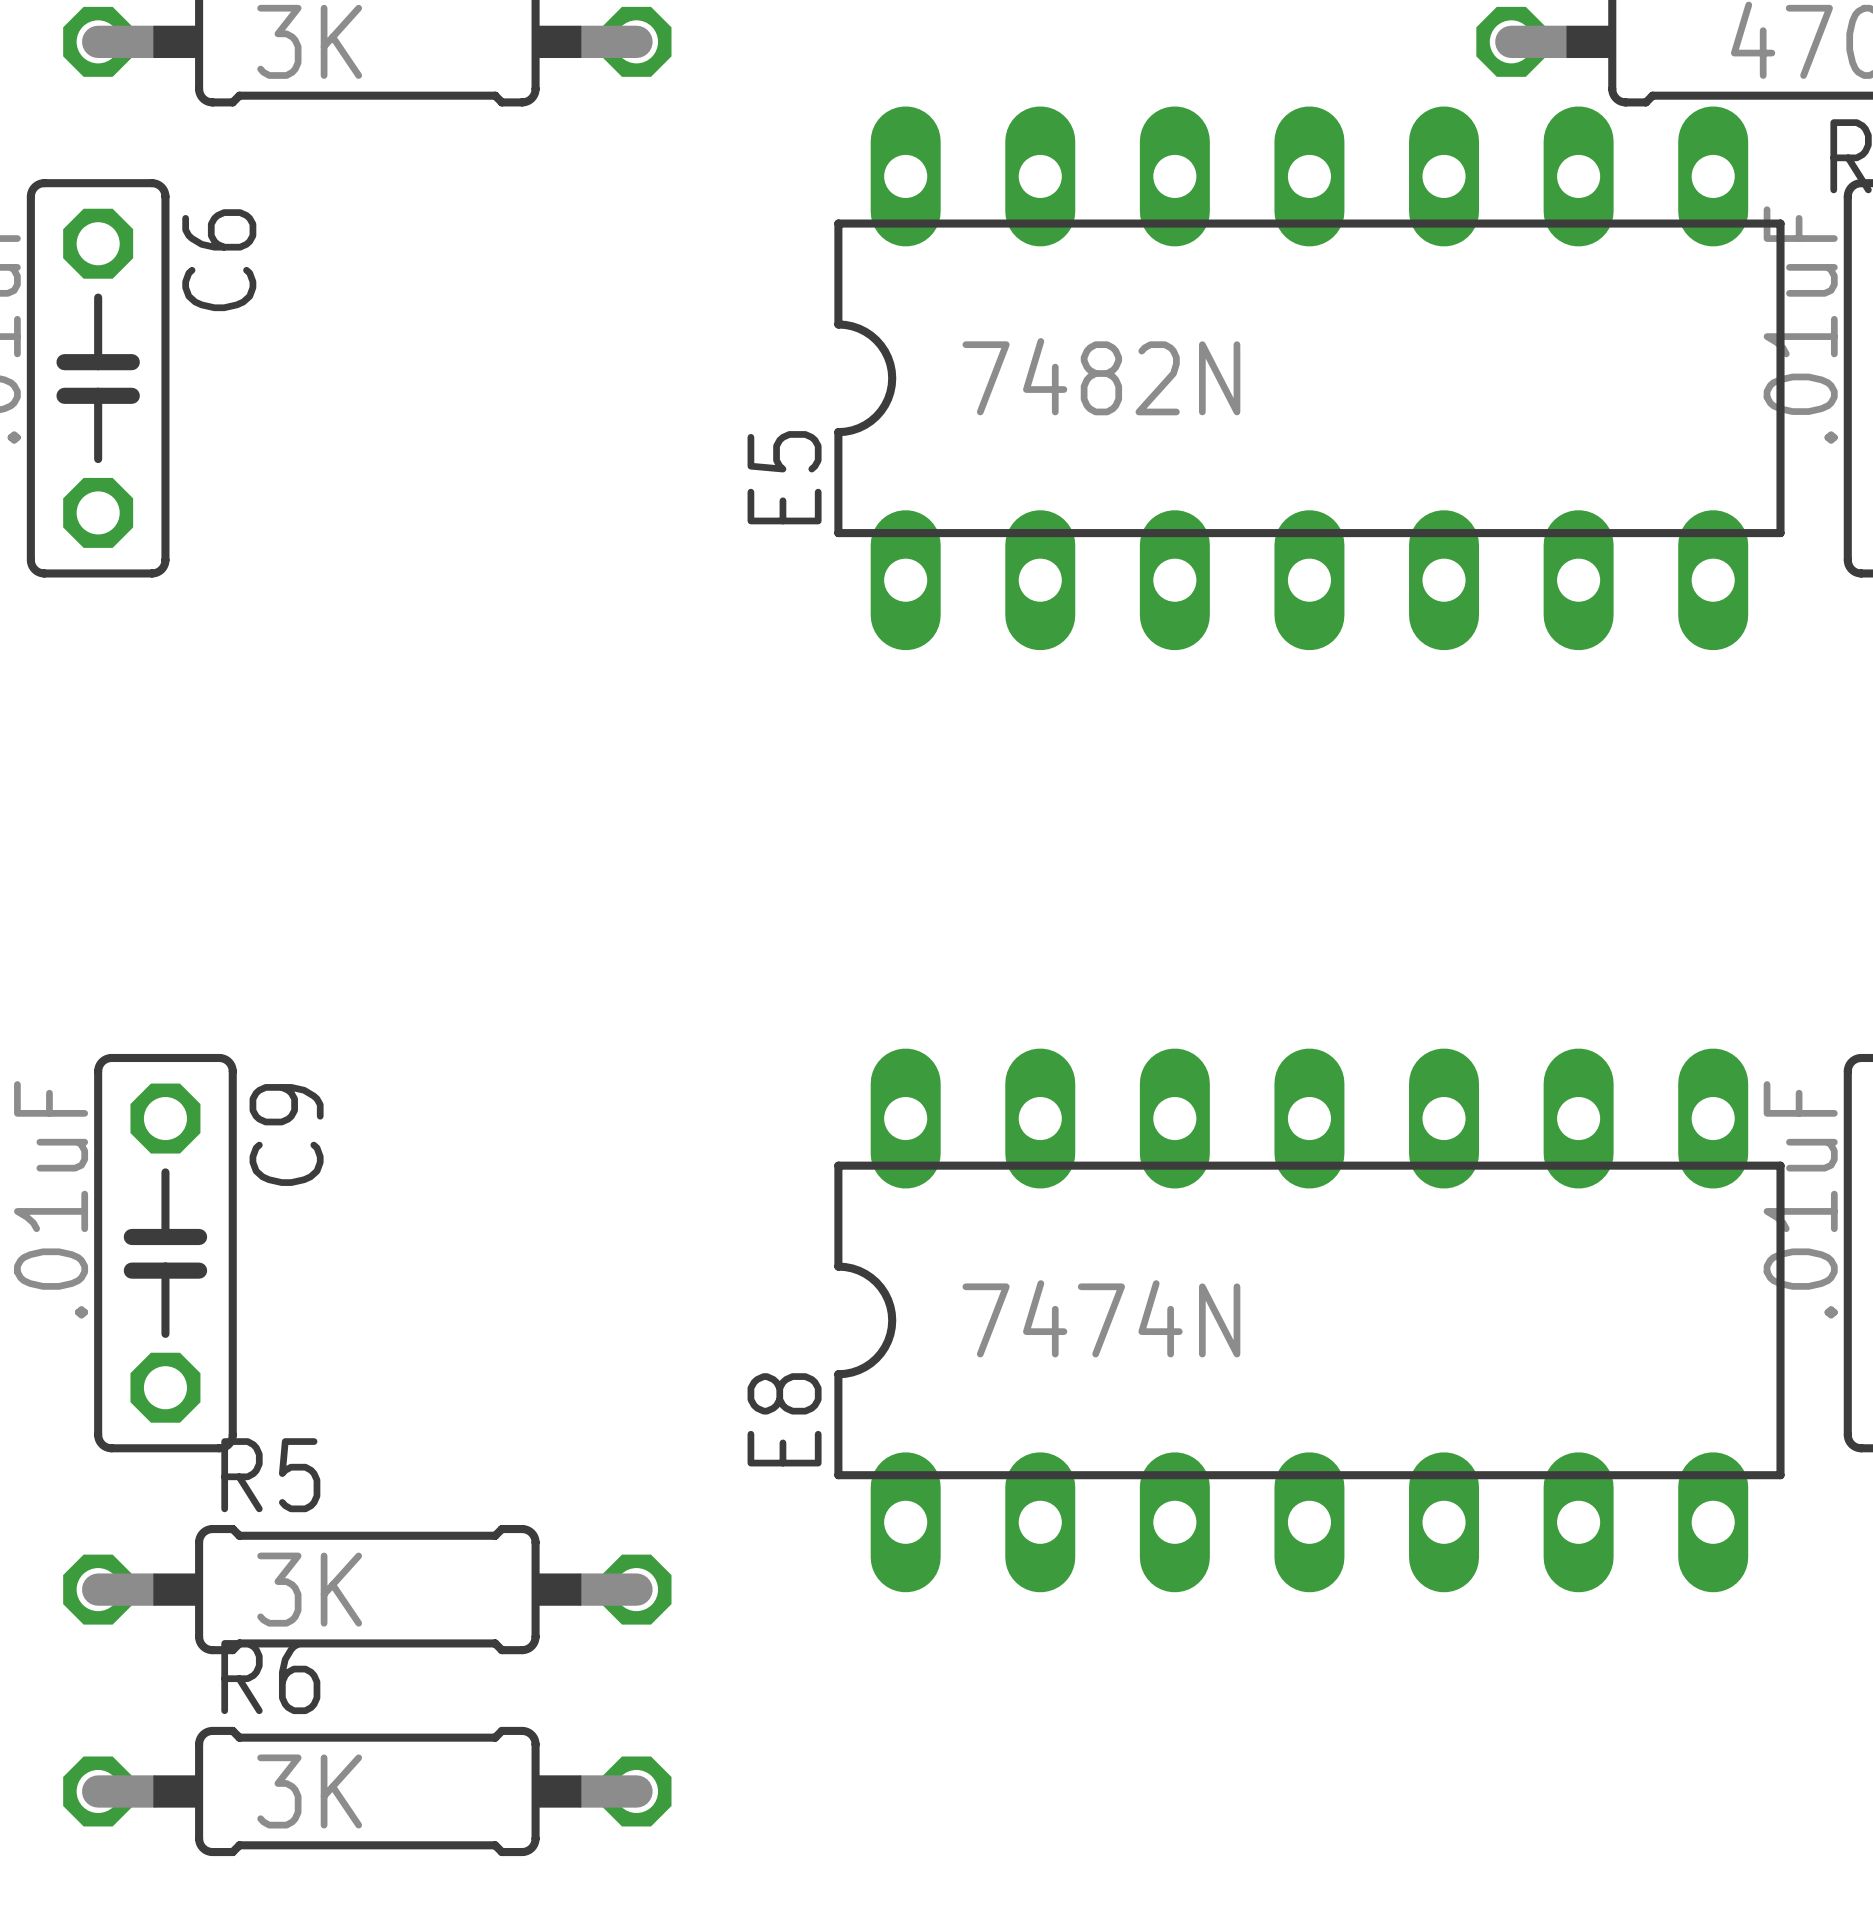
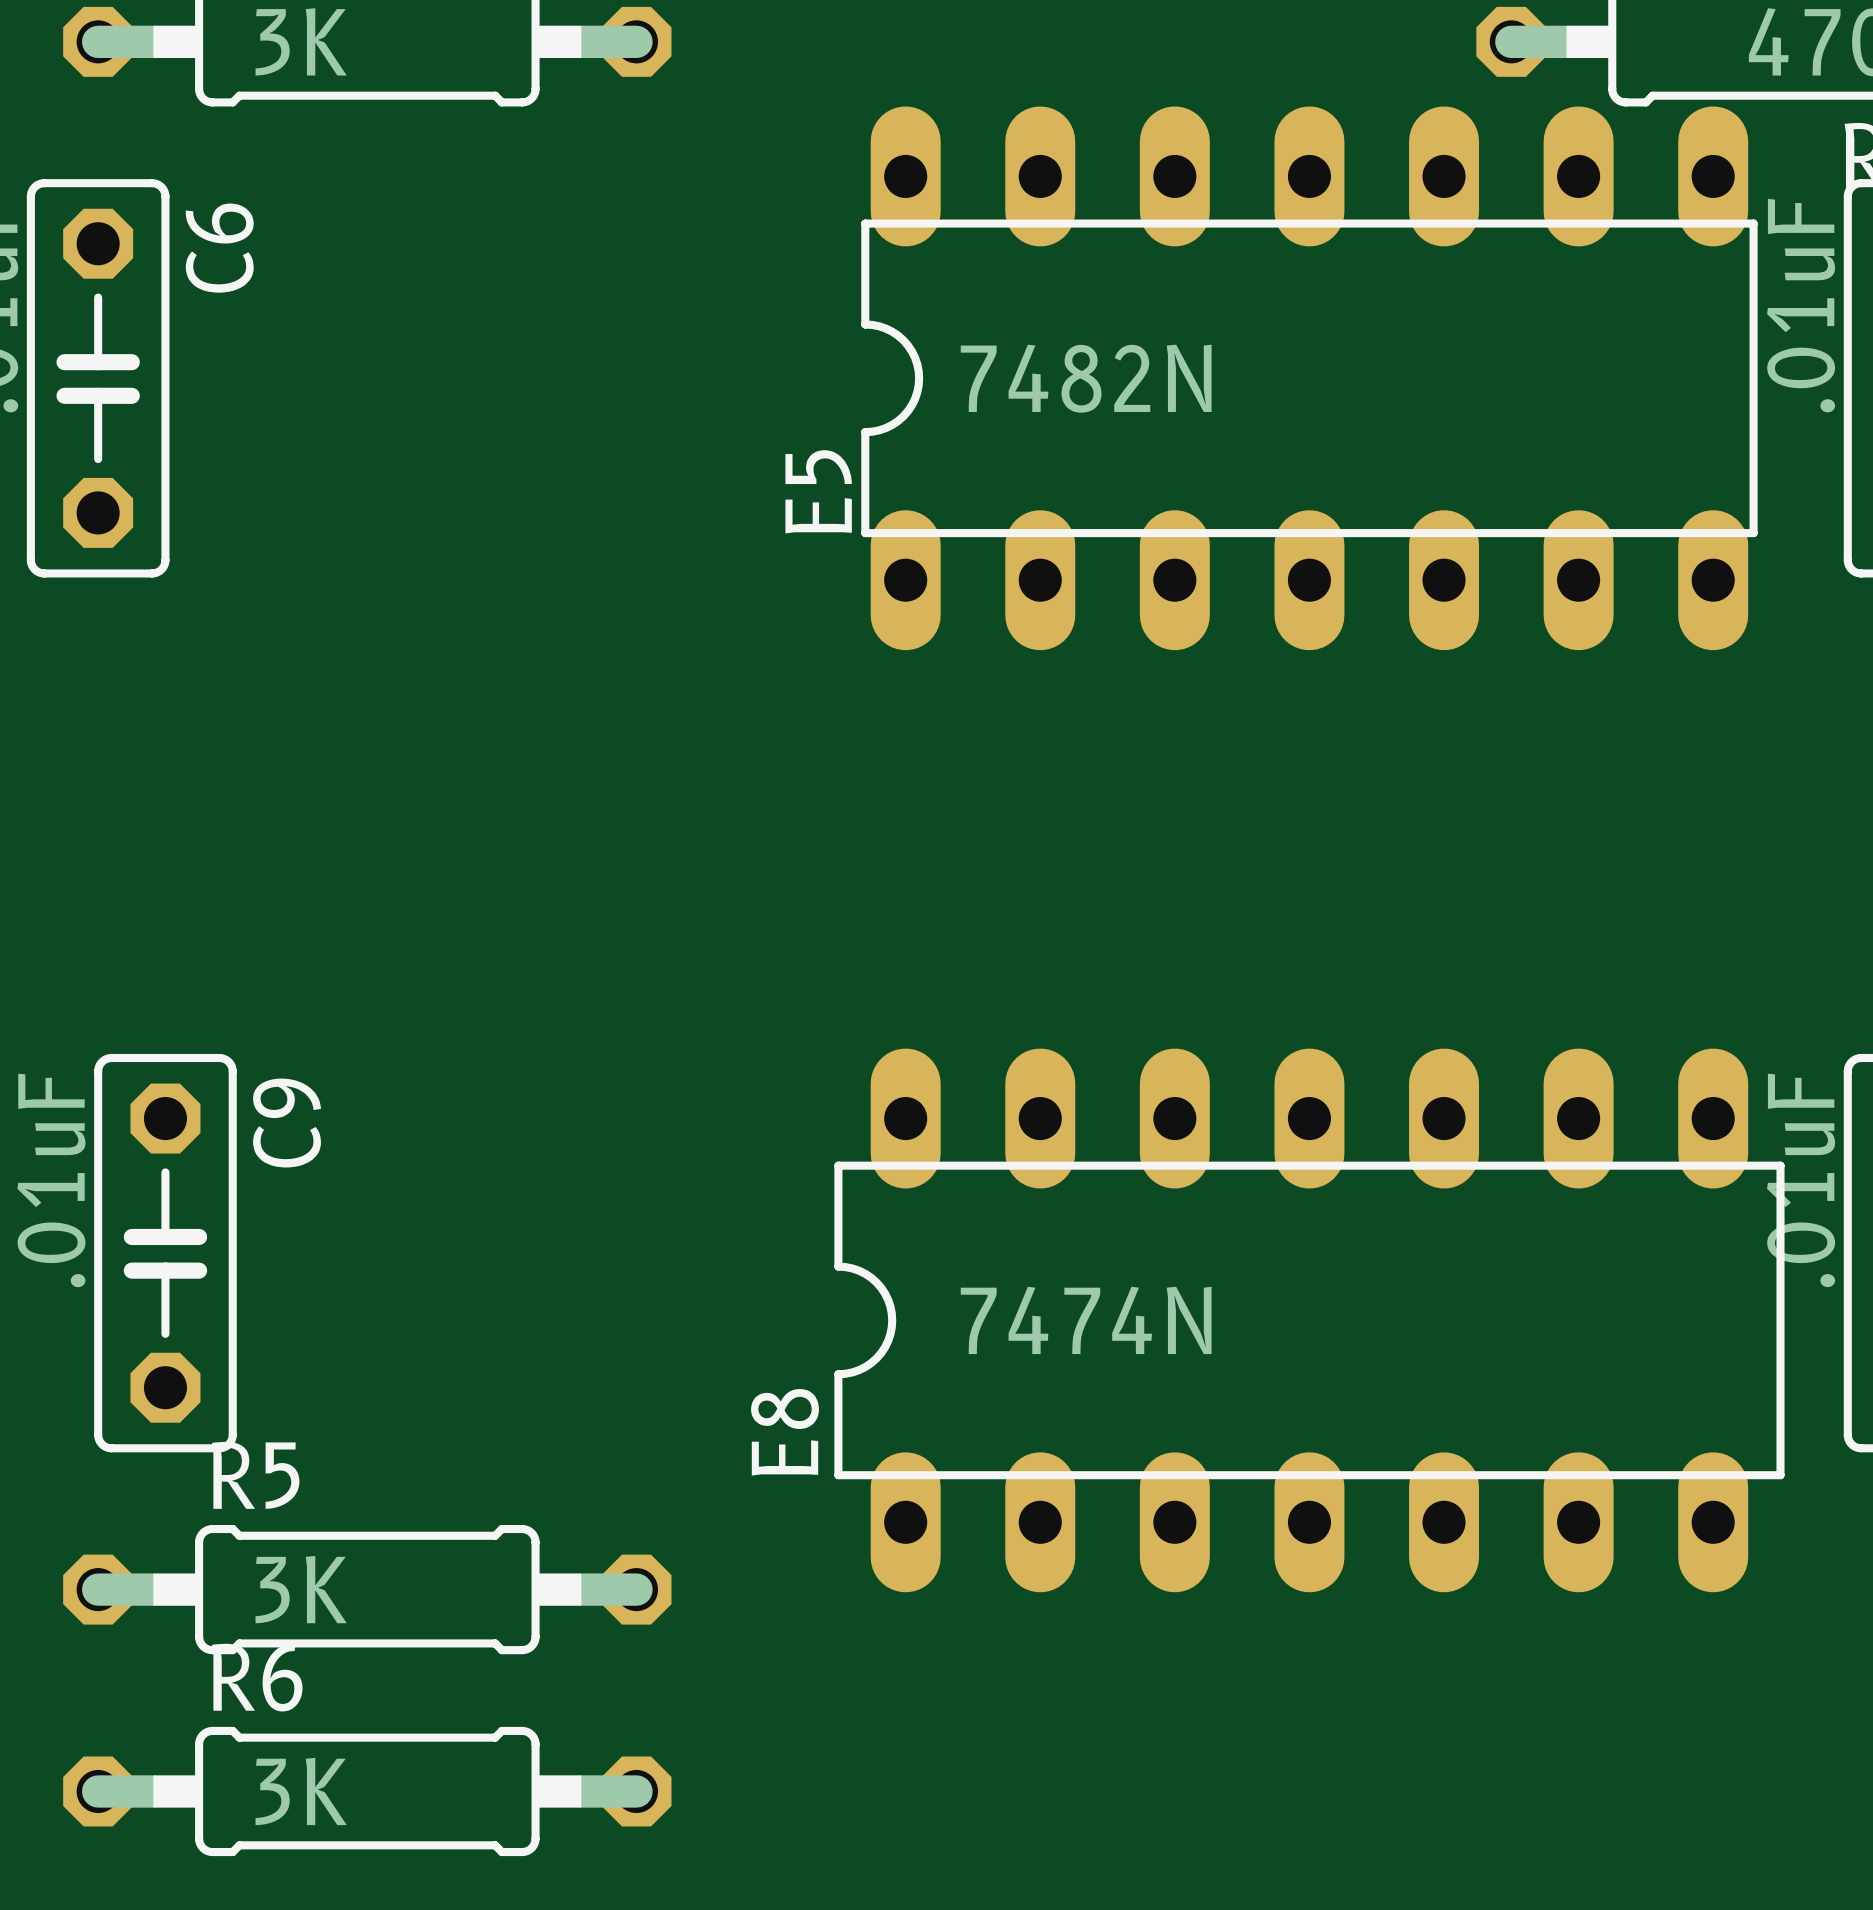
E5 footprint: [834, 106, 1785, 651] -> [861, 106, 1758, 651]
E5 name position: E5 (784, 477) -> E5 (818, 491)

